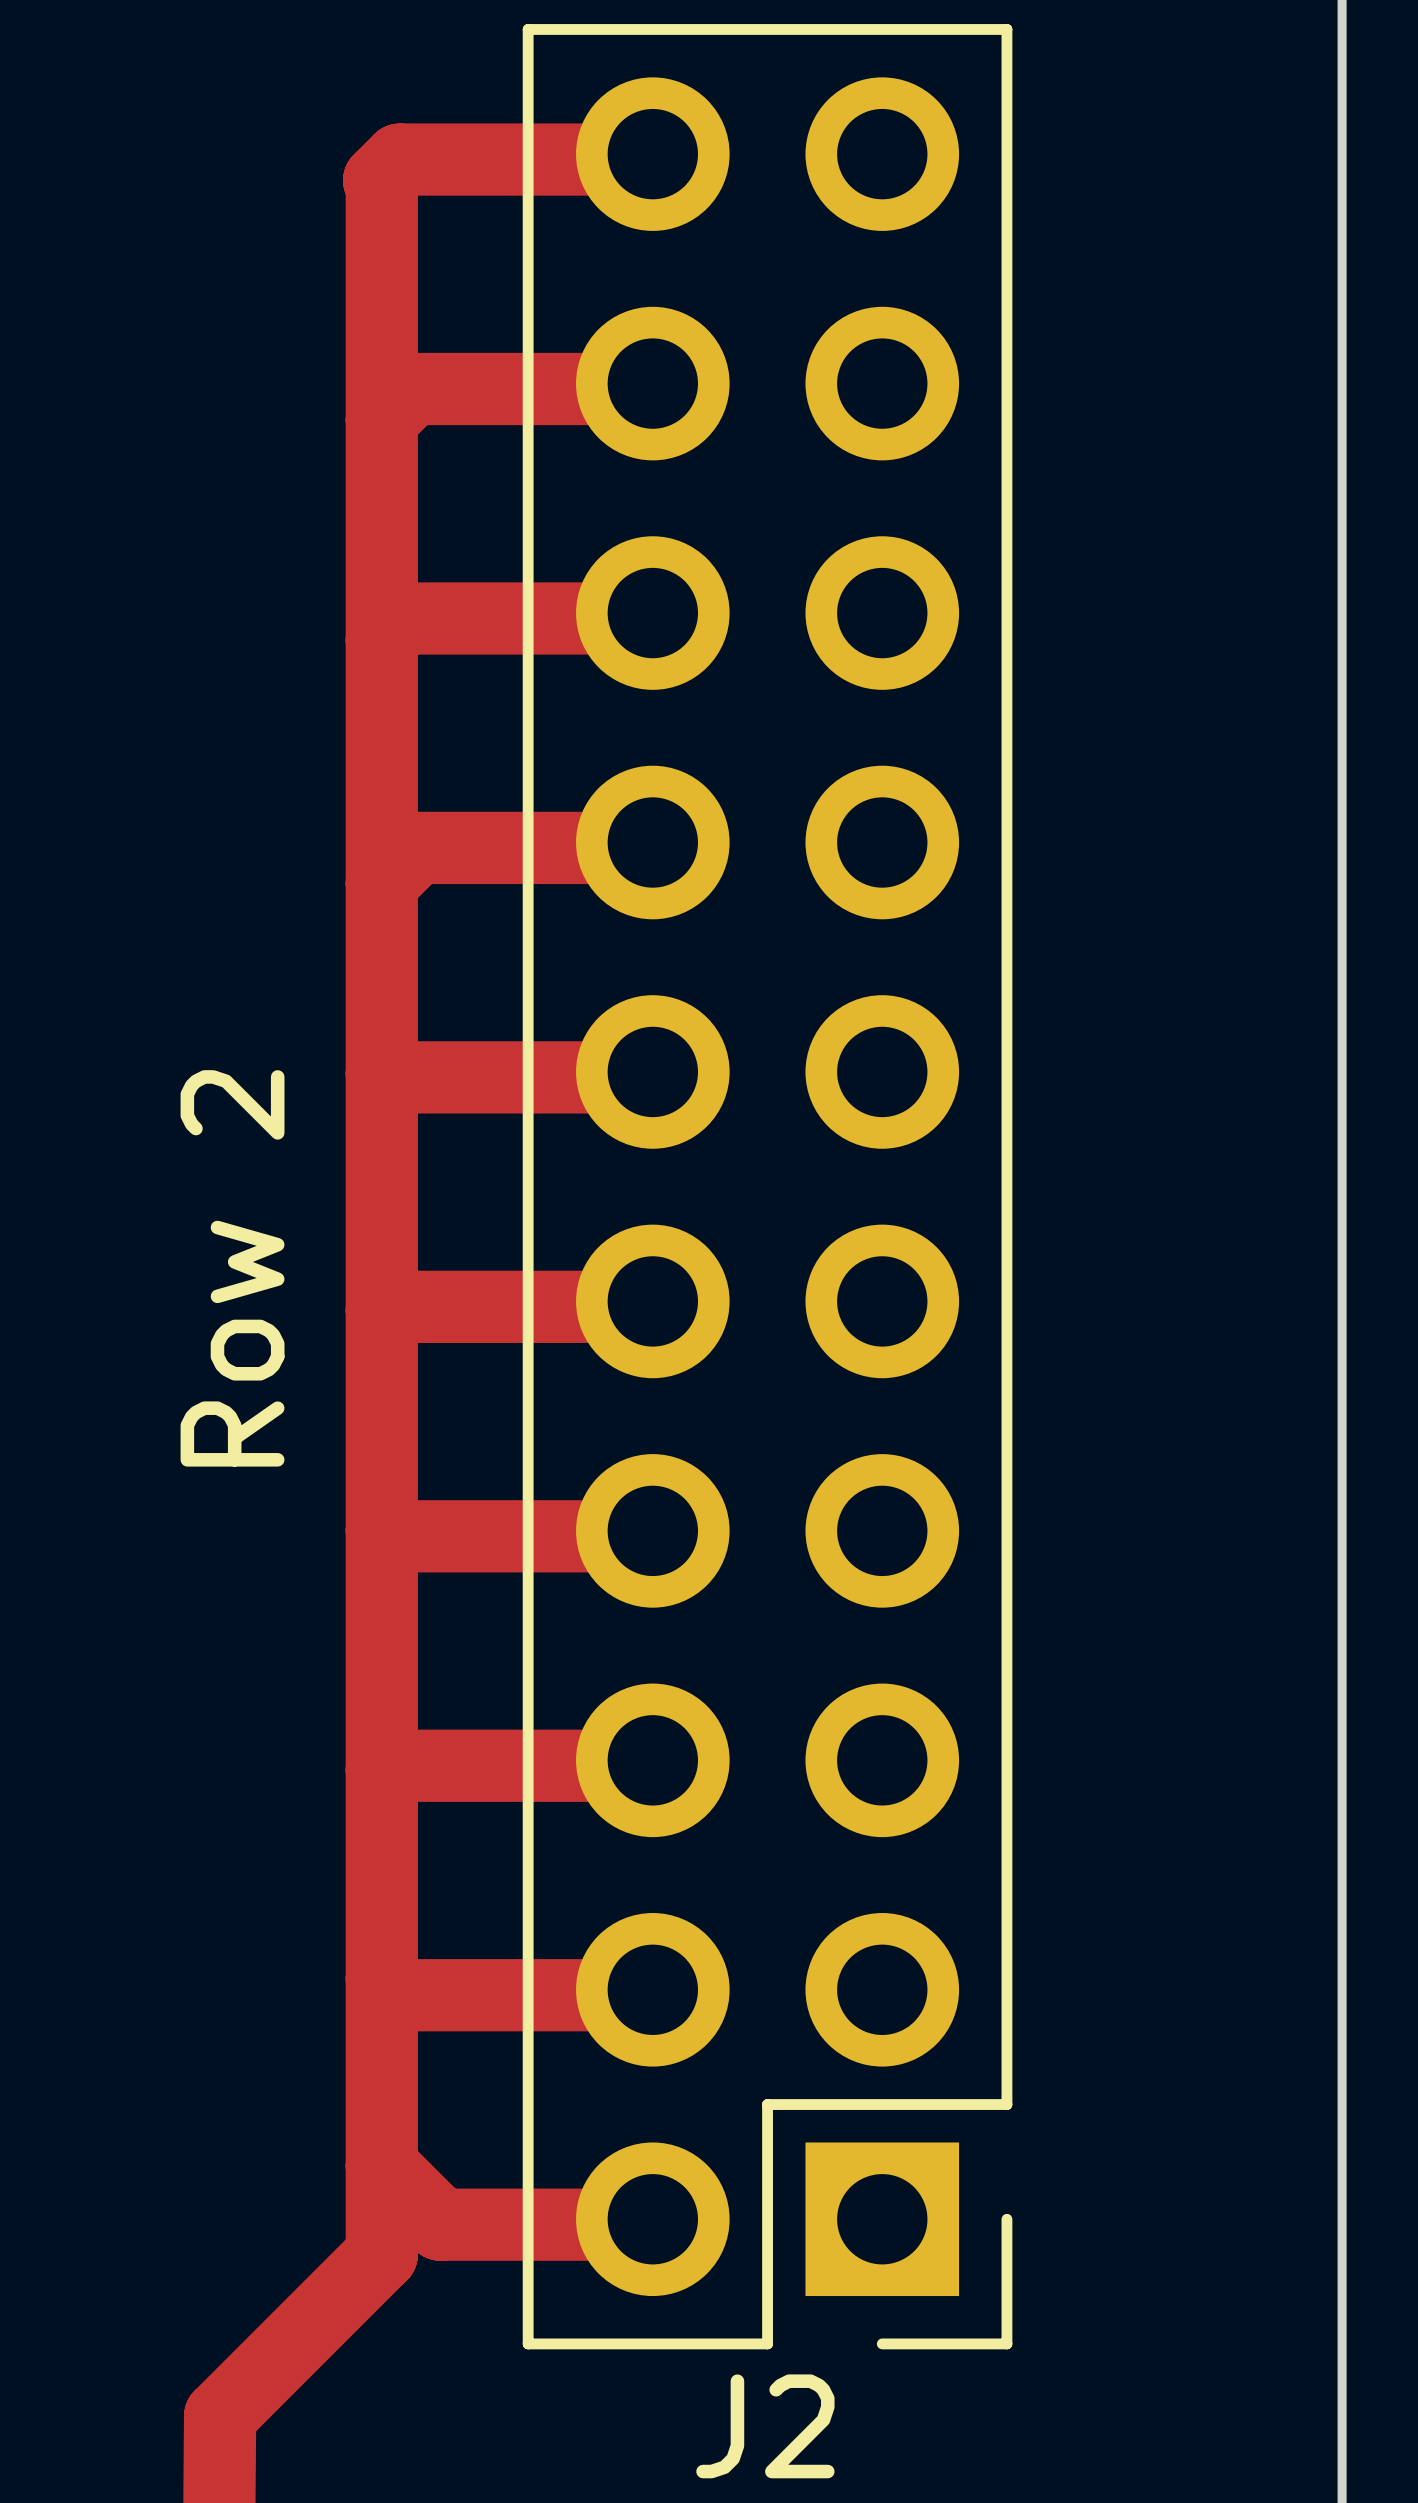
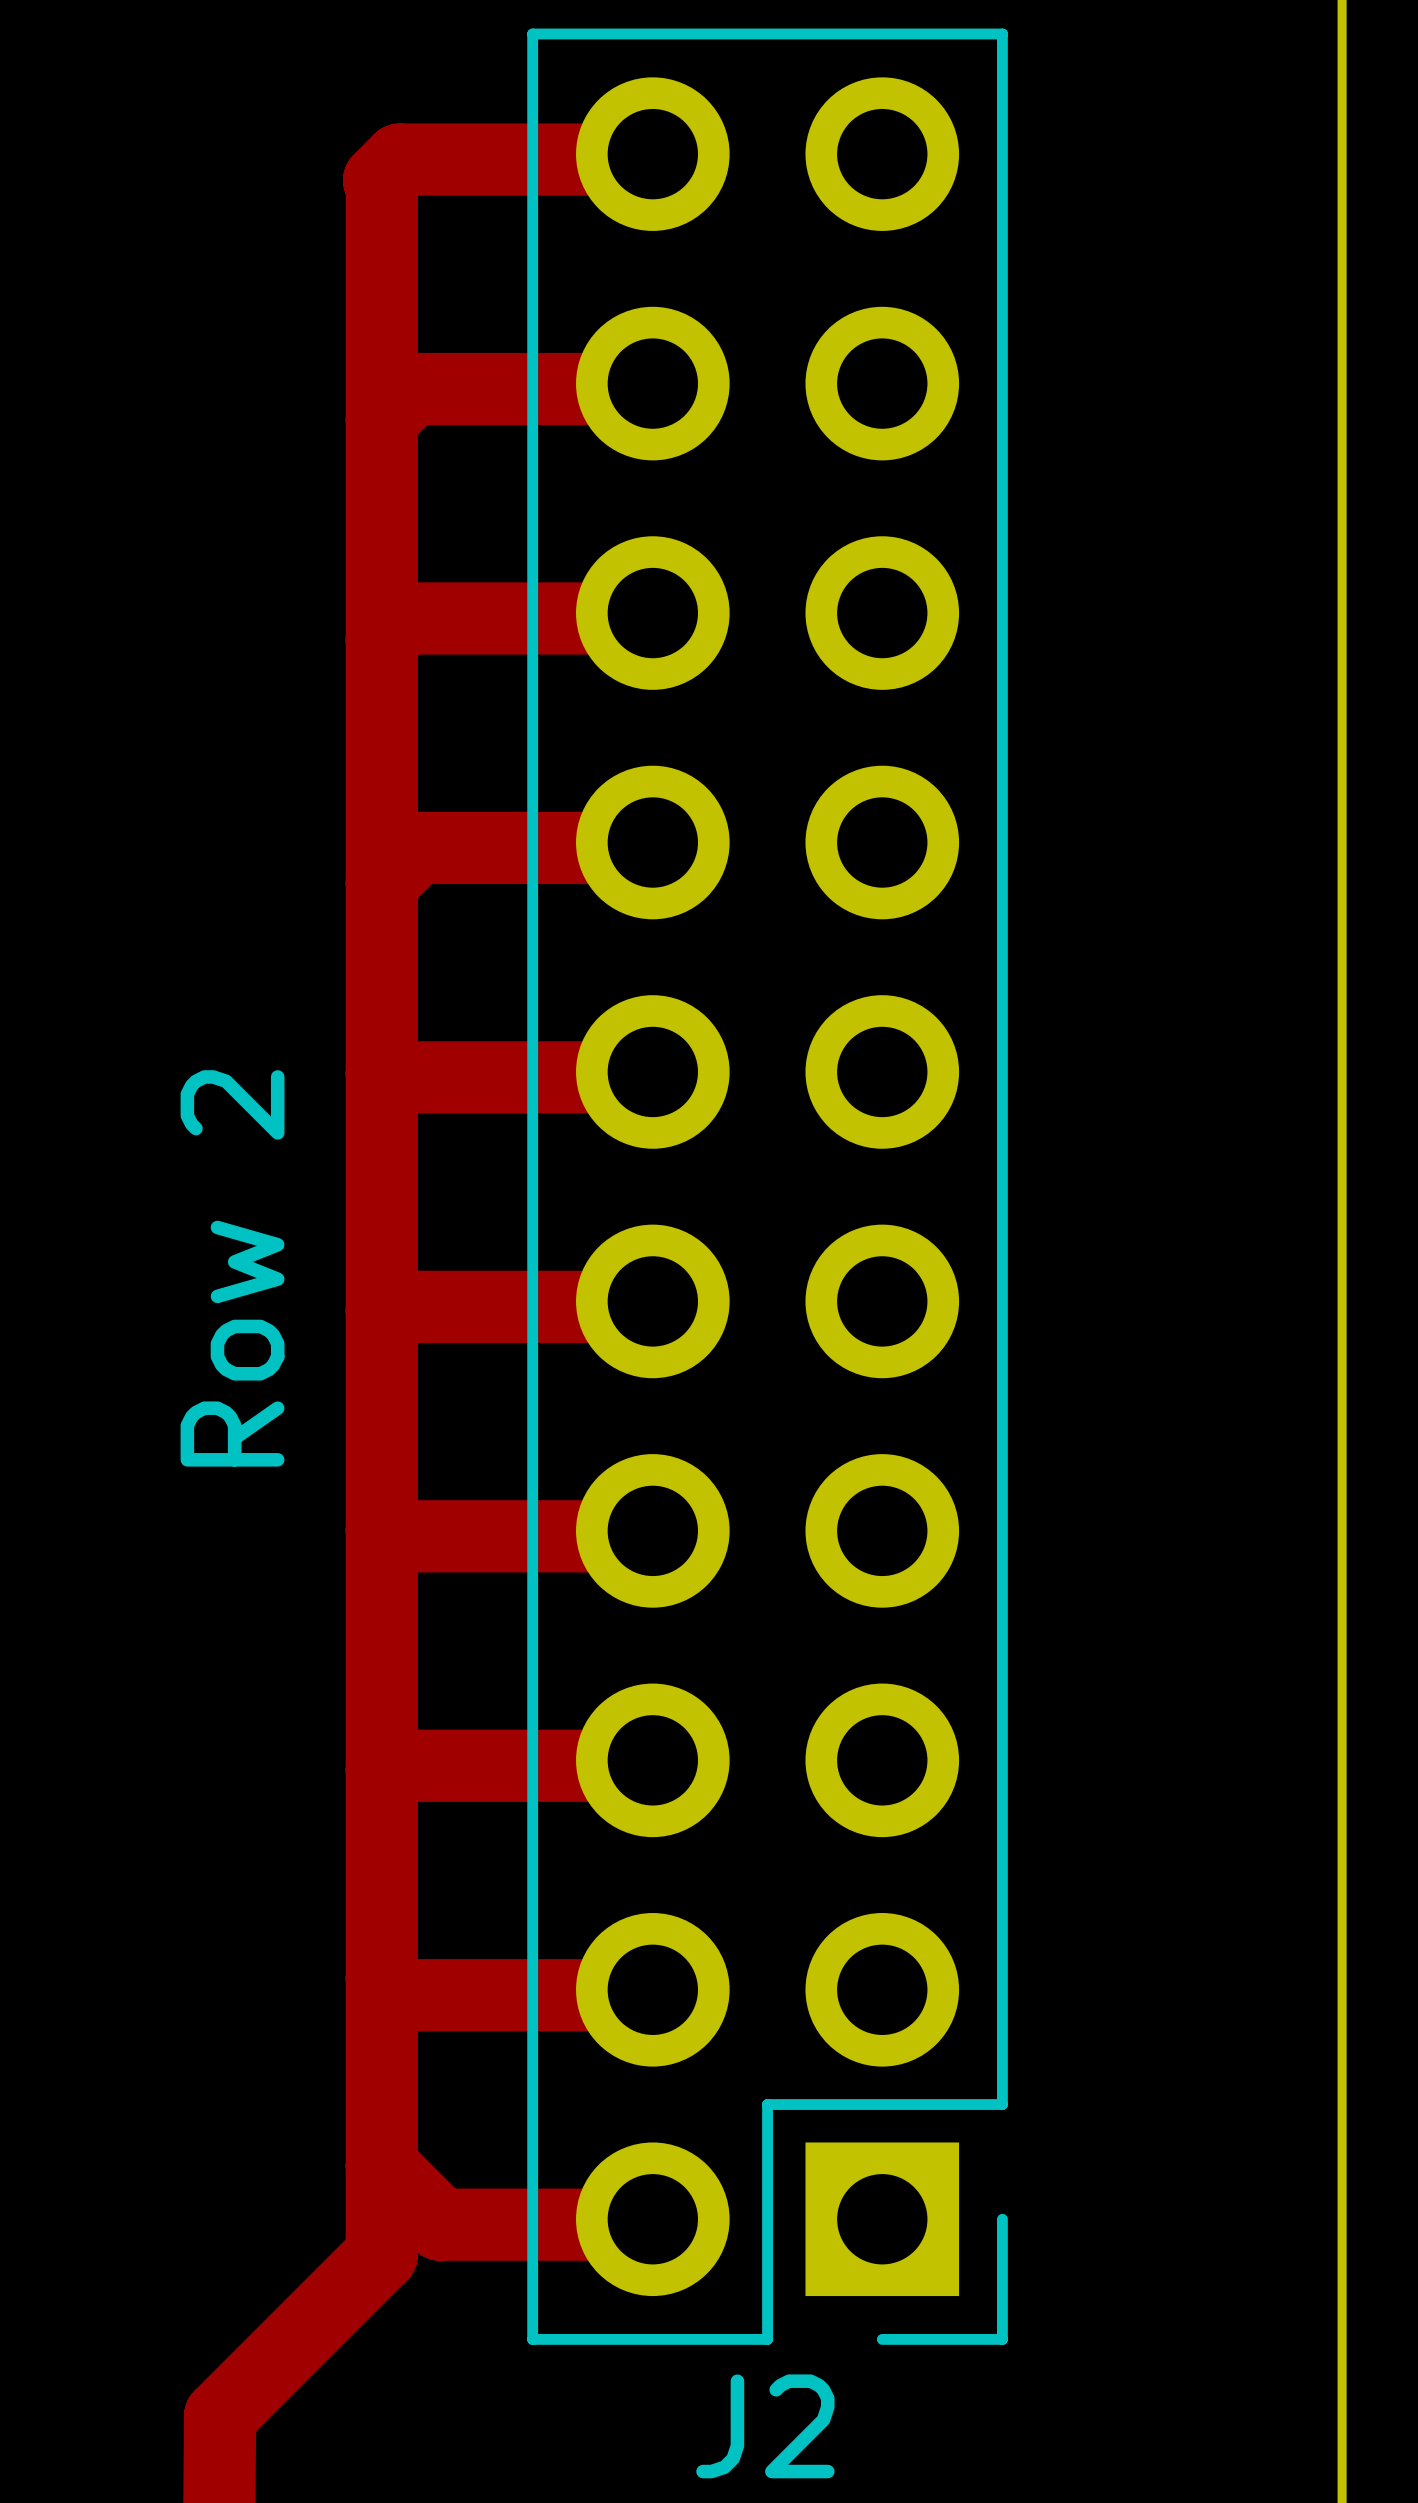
J2 footprint: [522, 24, 1013, 2350] -> [527, 28, 1008, 2345]

